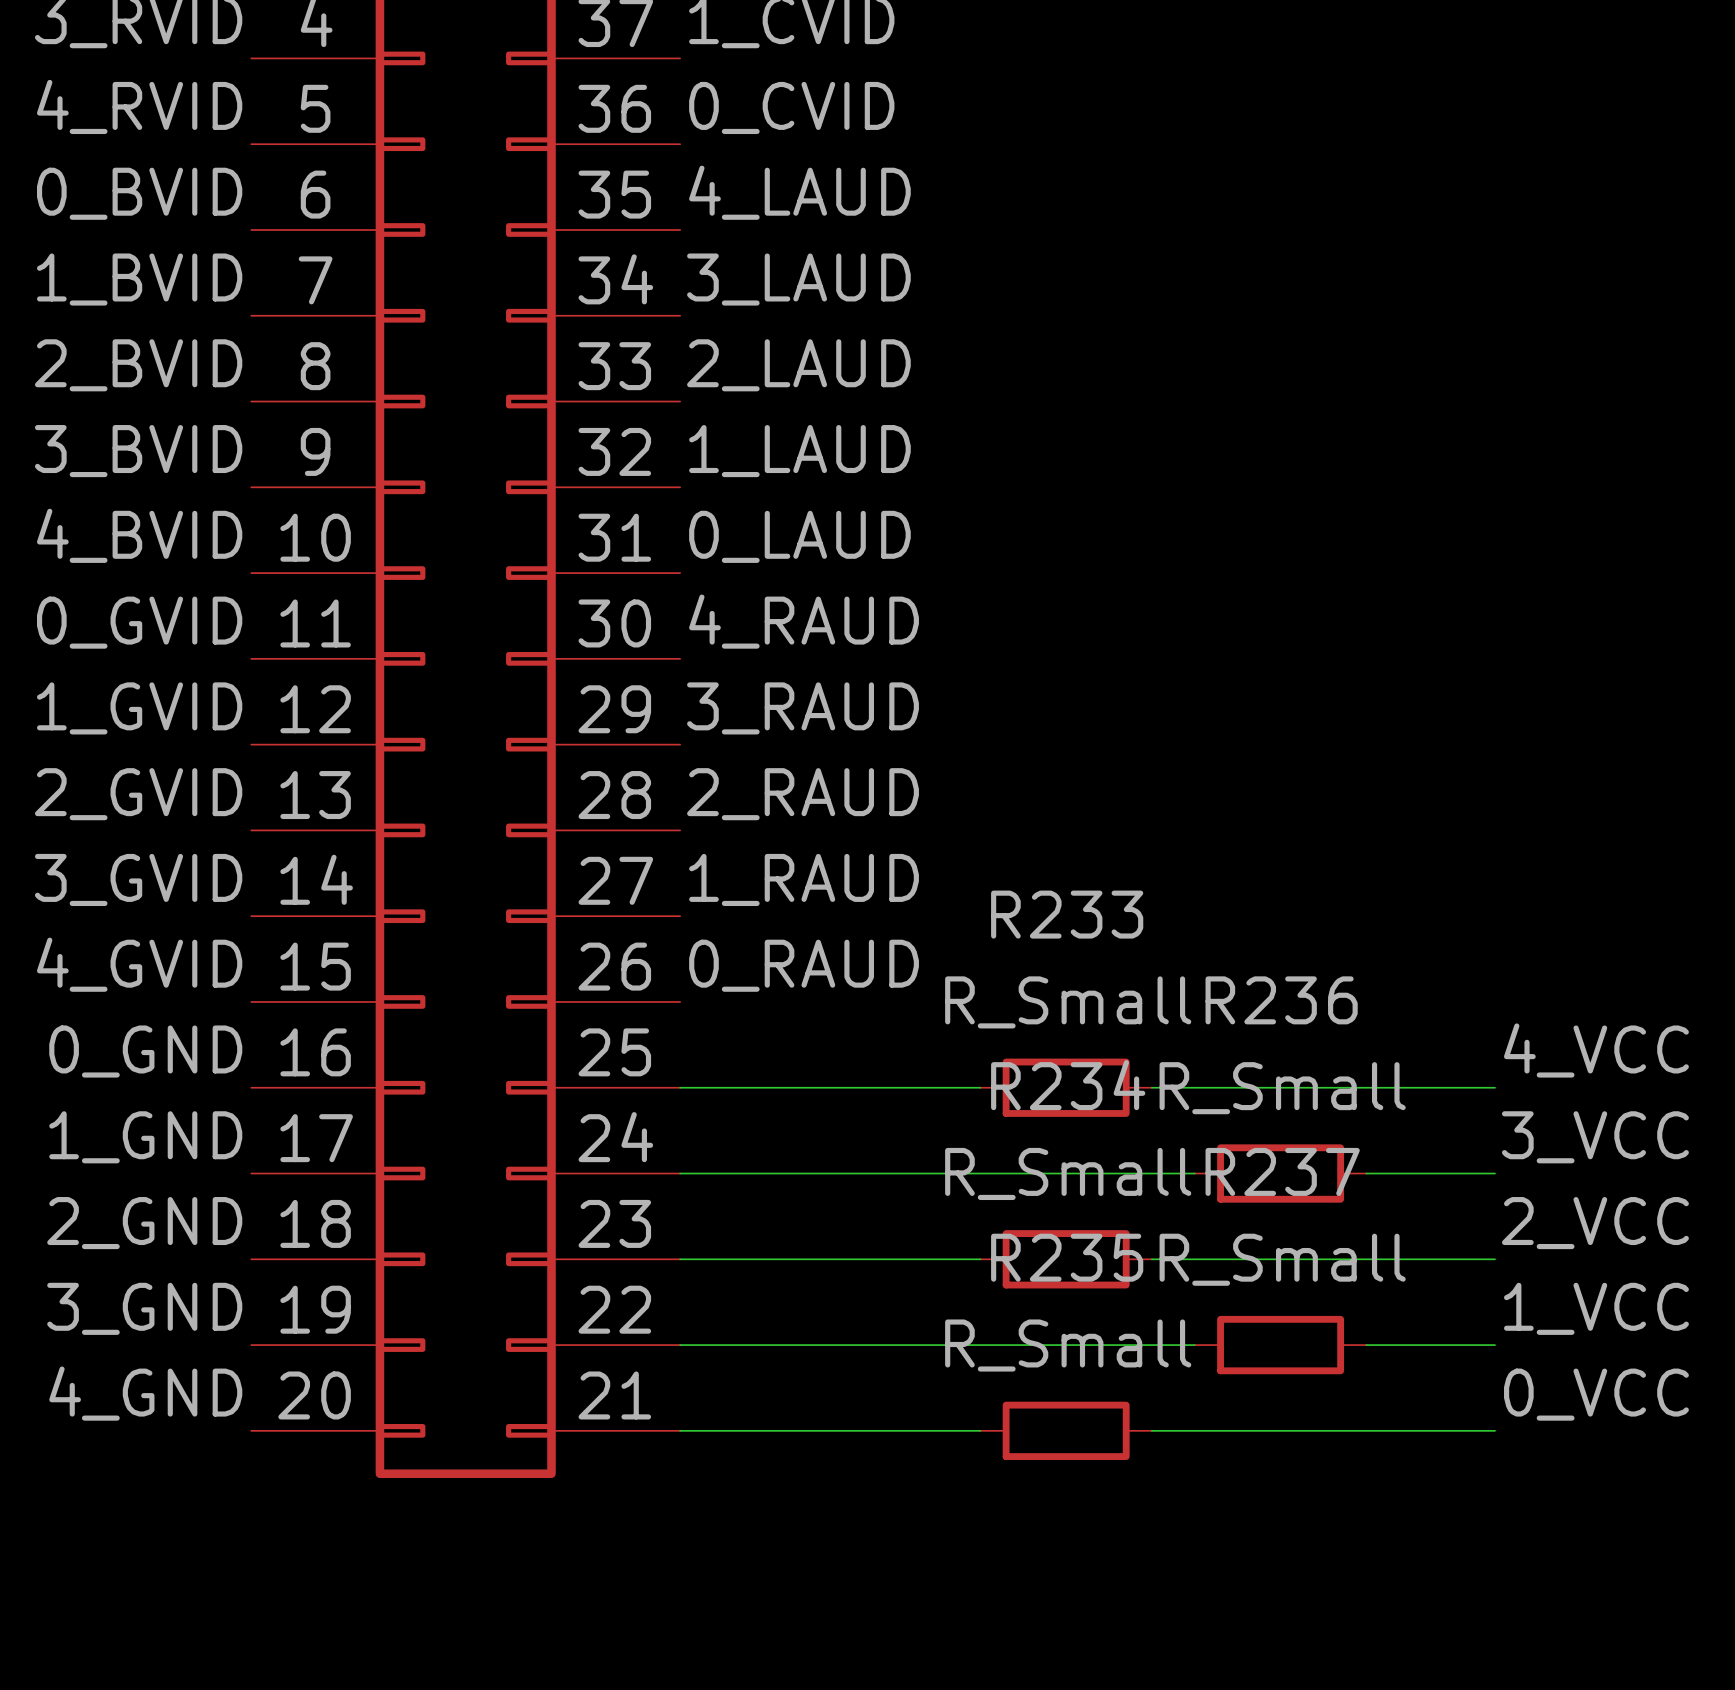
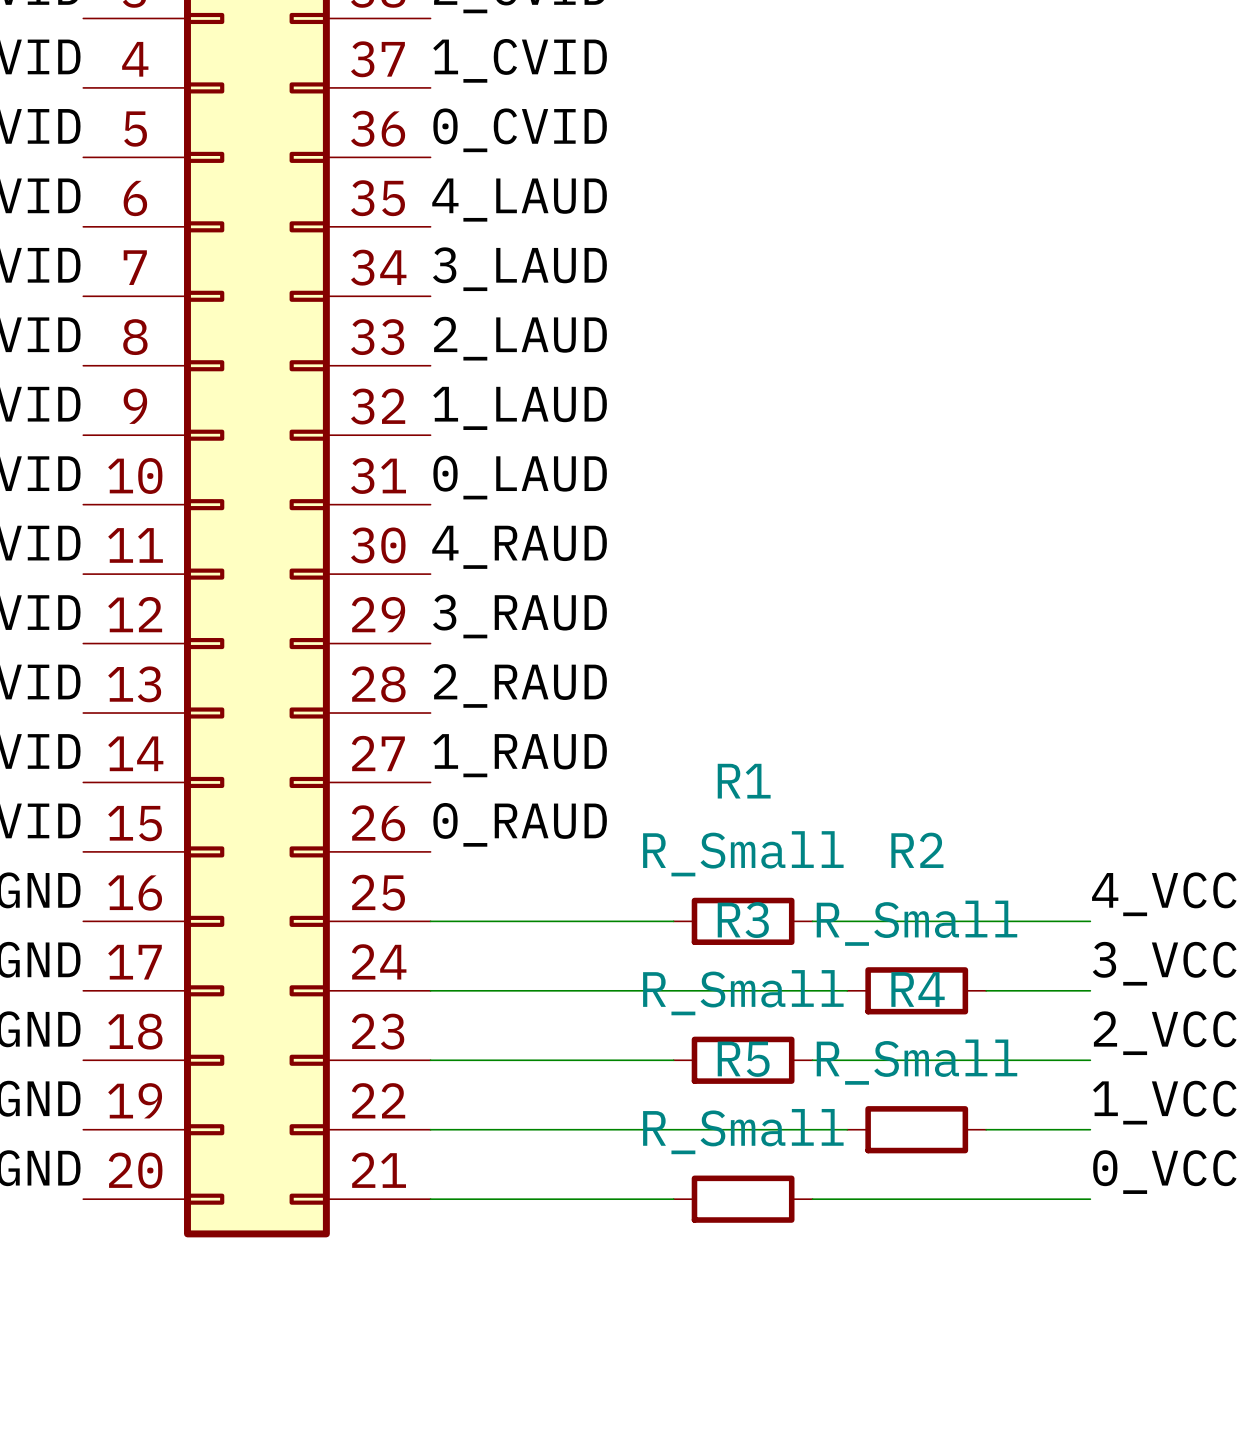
R233 name: R233 (1067, 914) -> R1 (744, 781)
R236 name: R236 (1281, 1000) -> R2 (917, 850)
R234 name: R234 (1068, 1085) -> R3 (743, 920)
R237 name: R237 (1282, 1171) -> R4 (918, 989)
R235 name: R235 (1067, 1257) -> R5 (743, 1059)

